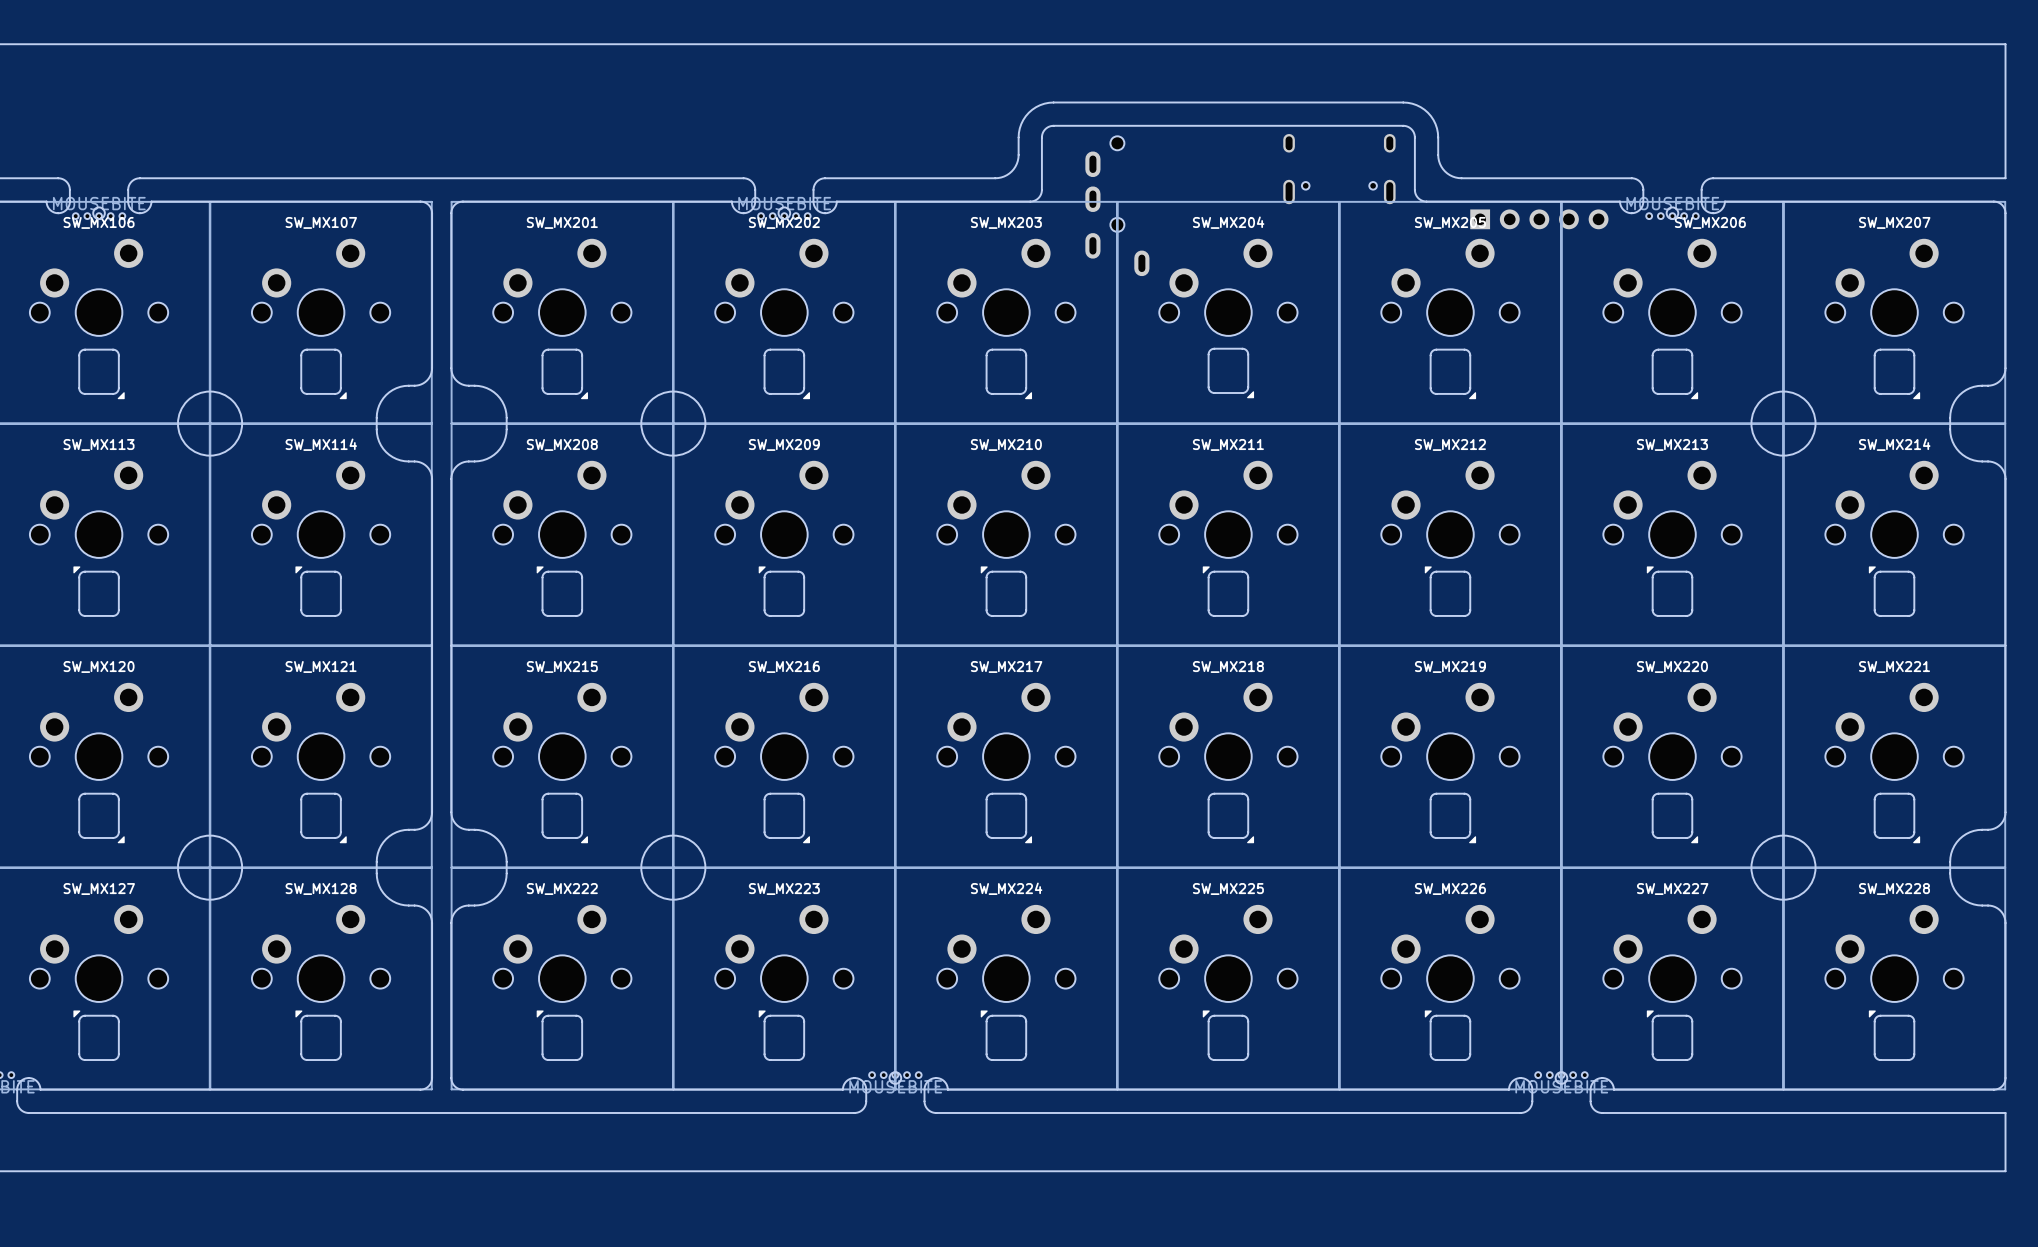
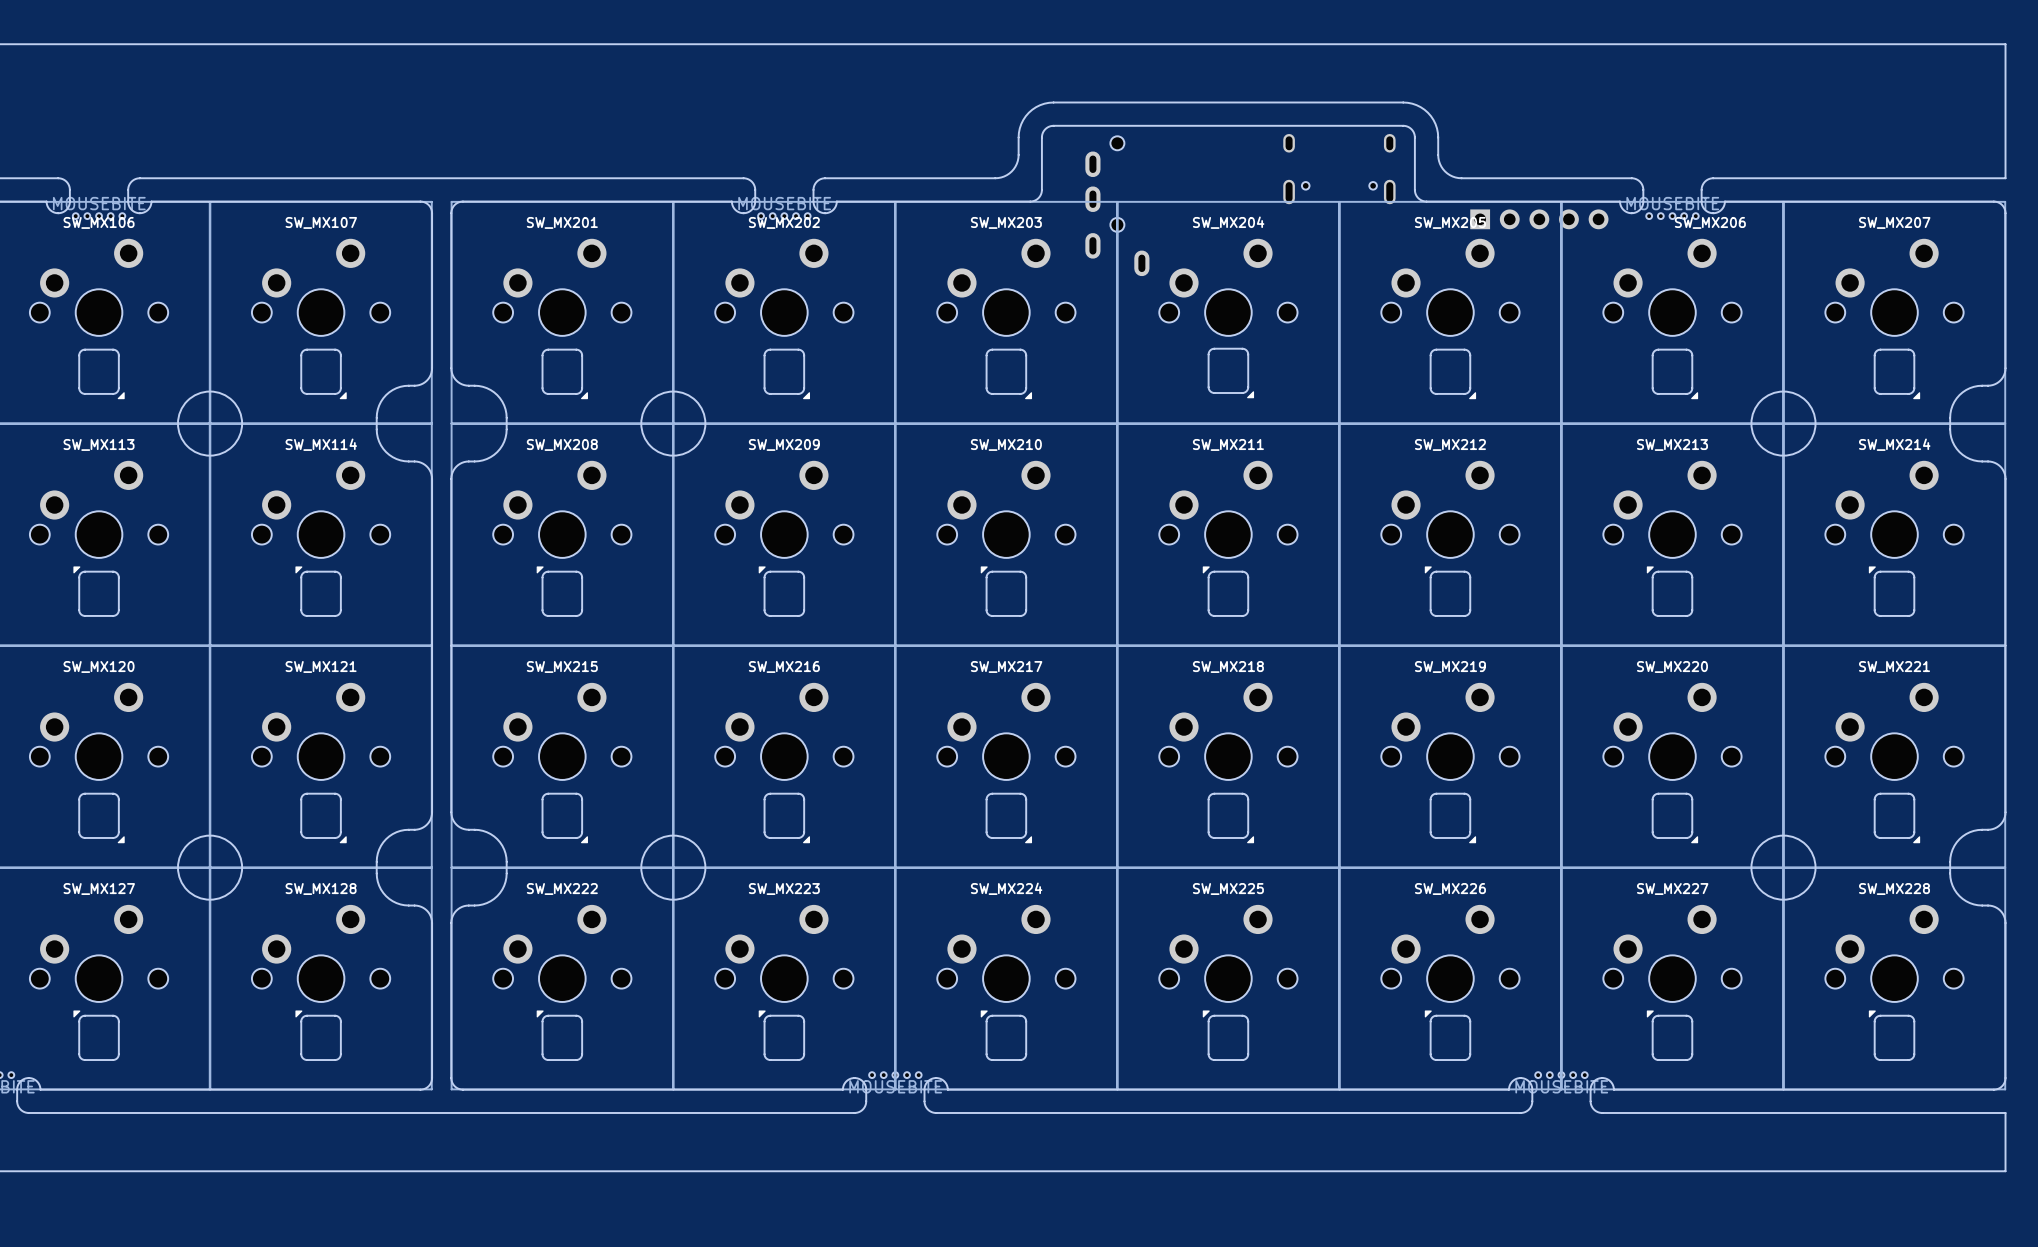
round board edge: [92, 206, 106, 220] -> none
round board edge: [777, 206, 791, 220] -> none
round board edge: [1666, 206, 1679, 220] -> none
round board edge: [888, 1071, 902, 1085] -> none
round board edge: [1555, 1071, 1568, 1085] -> none

